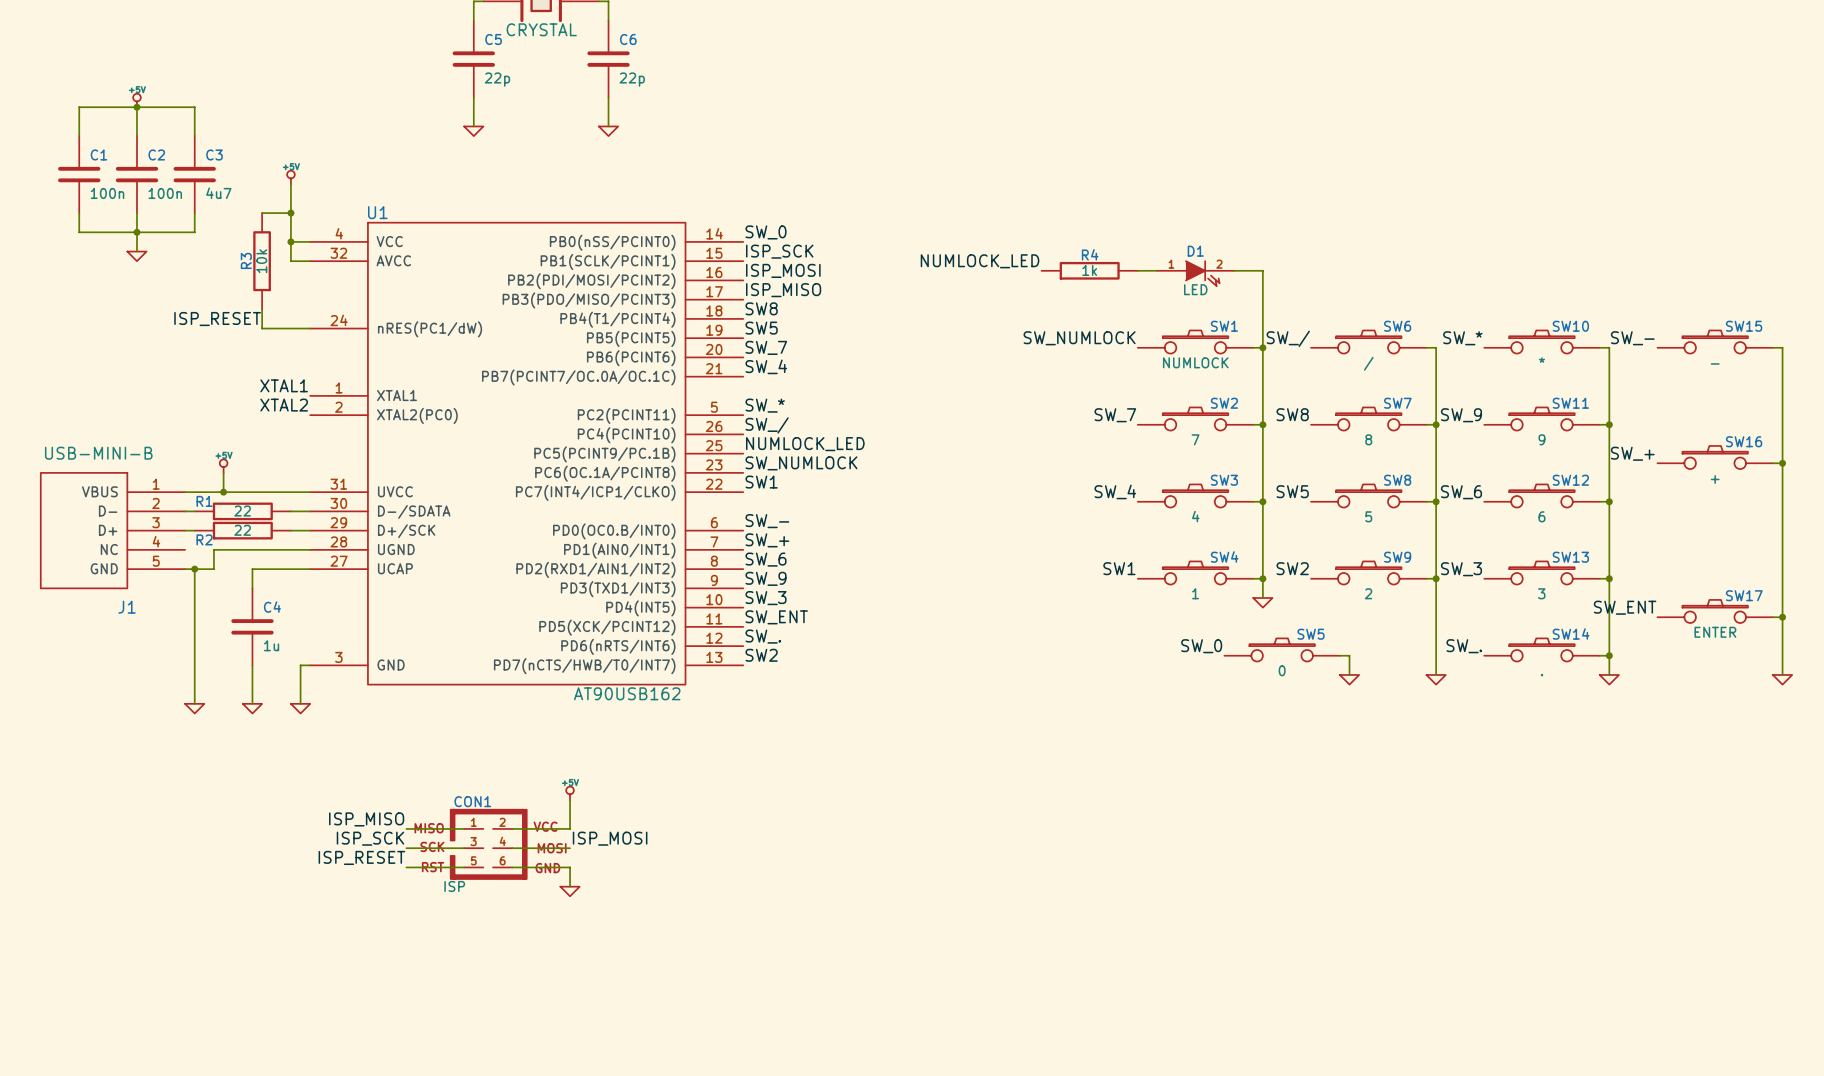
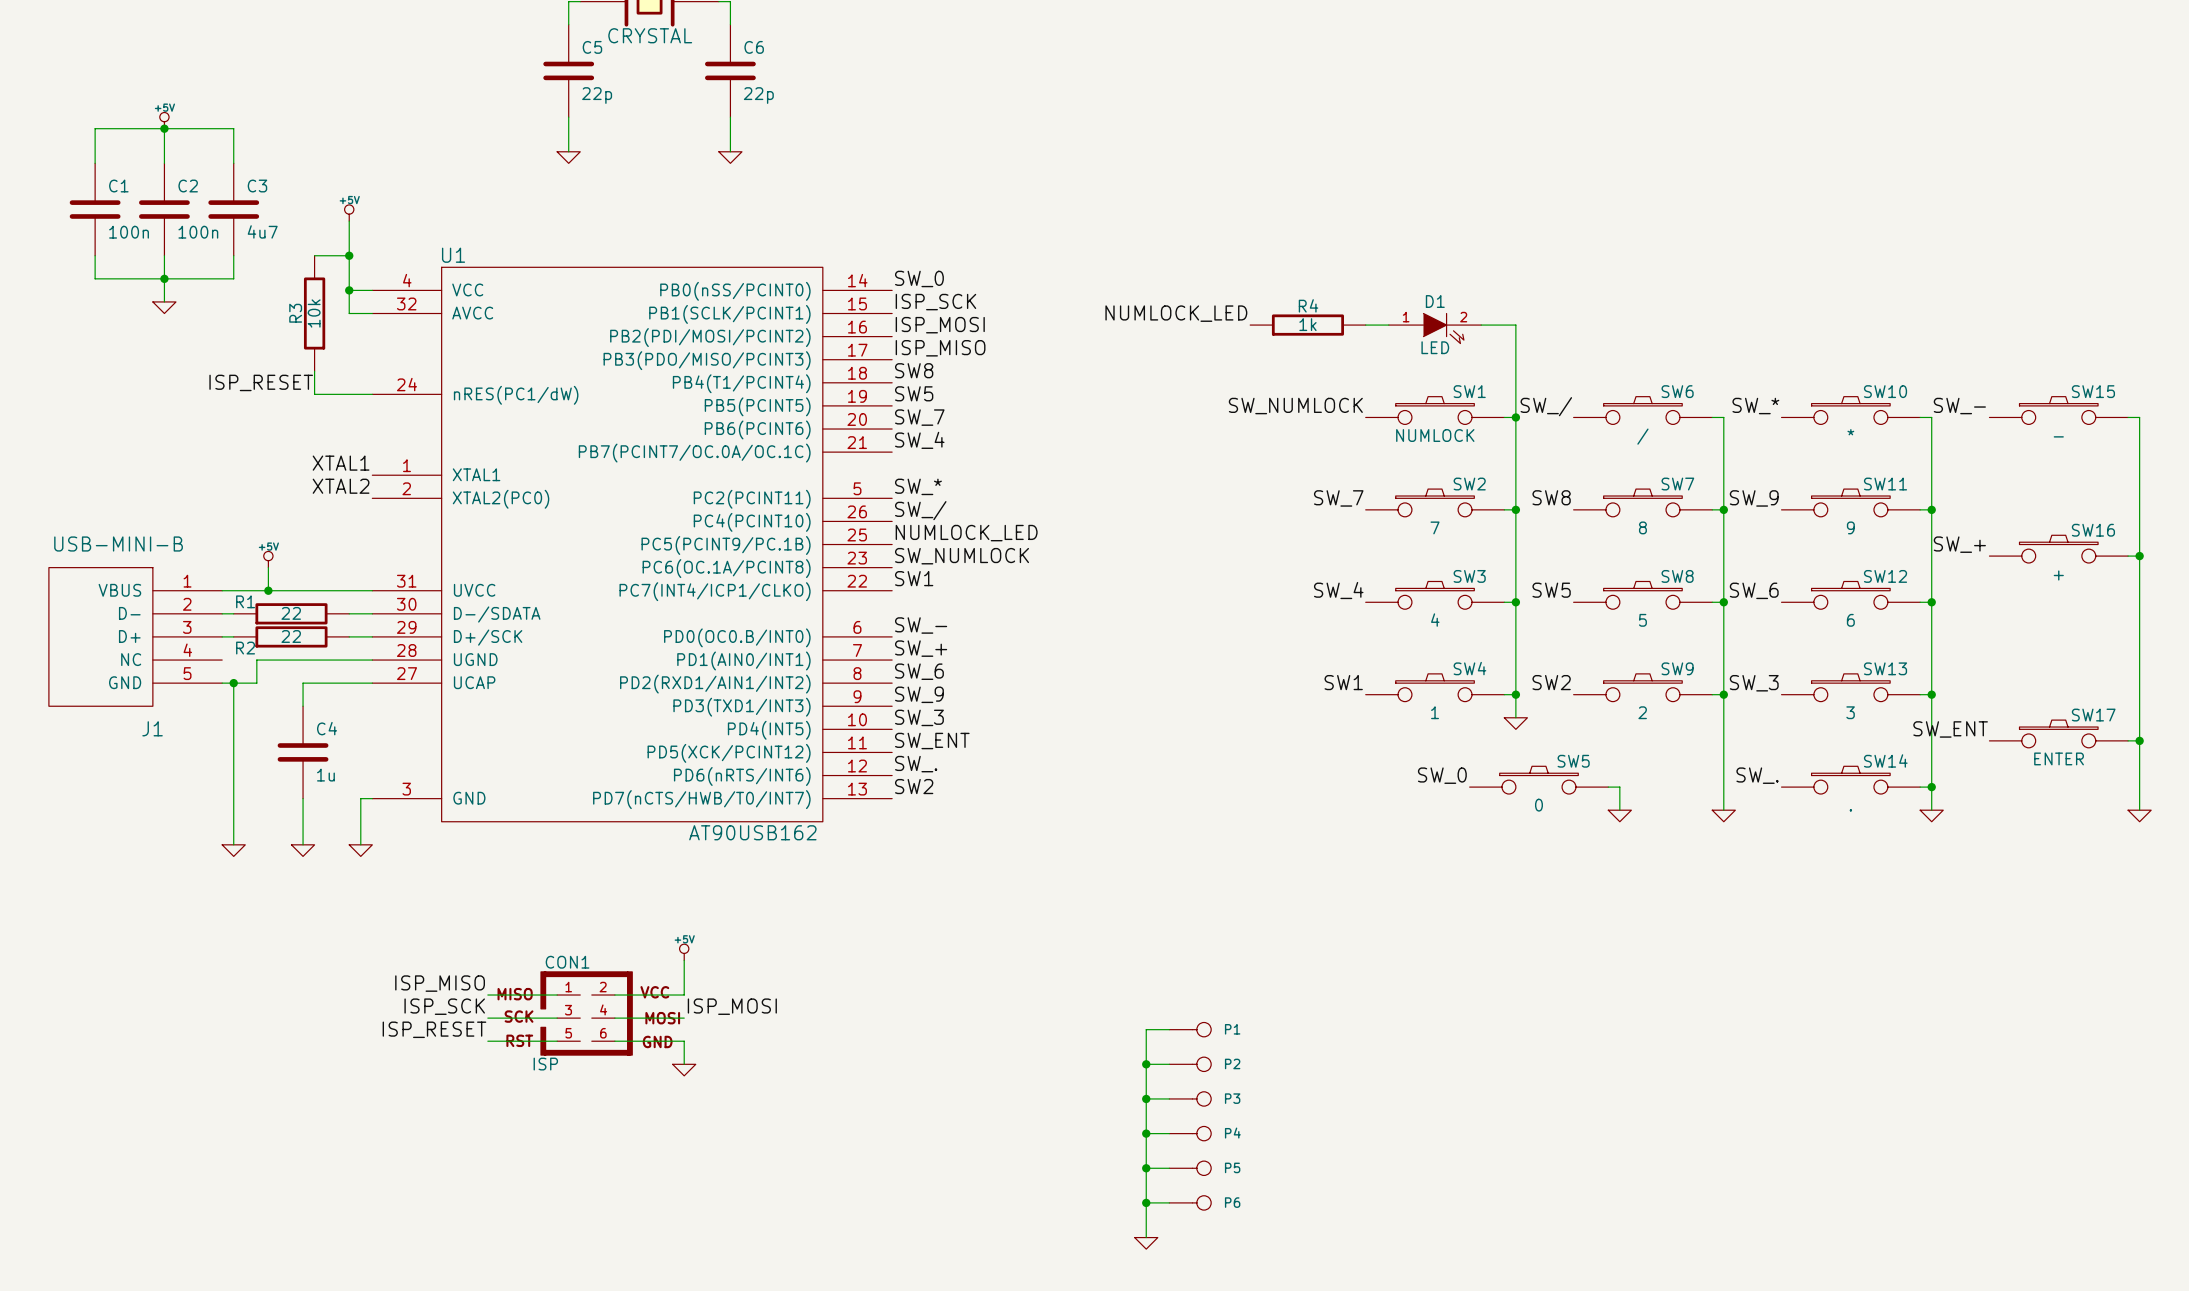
wire: none -> (1169, 1029) (1146, 1029) (1146, 1237)
P1: none -> (1190, 1029)
wire: none -> (1146, 1064) (1169, 1064)
junction: none -> (1146, 1064)
P2: none -> (1190, 1064)
wire: none -> (1146, 1098) (1169, 1098)
junction: none -> (1146, 1098)
P3: none -> (1190, 1098)
wire: none -> (1146, 1133) (1169, 1133)
junction: none -> (1146, 1133)
P4: none -> (1190, 1133)
wire: none -> (1146, 1168) (1169, 1168)
junction: none -> (1146, 1168)
P5: none -> (1190, 1168)
wire: none -> (1146, 1202) (1169, 1202)
junction: none -> (1146, 1202)
P6: none -> (1190, 1202)
power symbol: none -> (1146, 1243)

